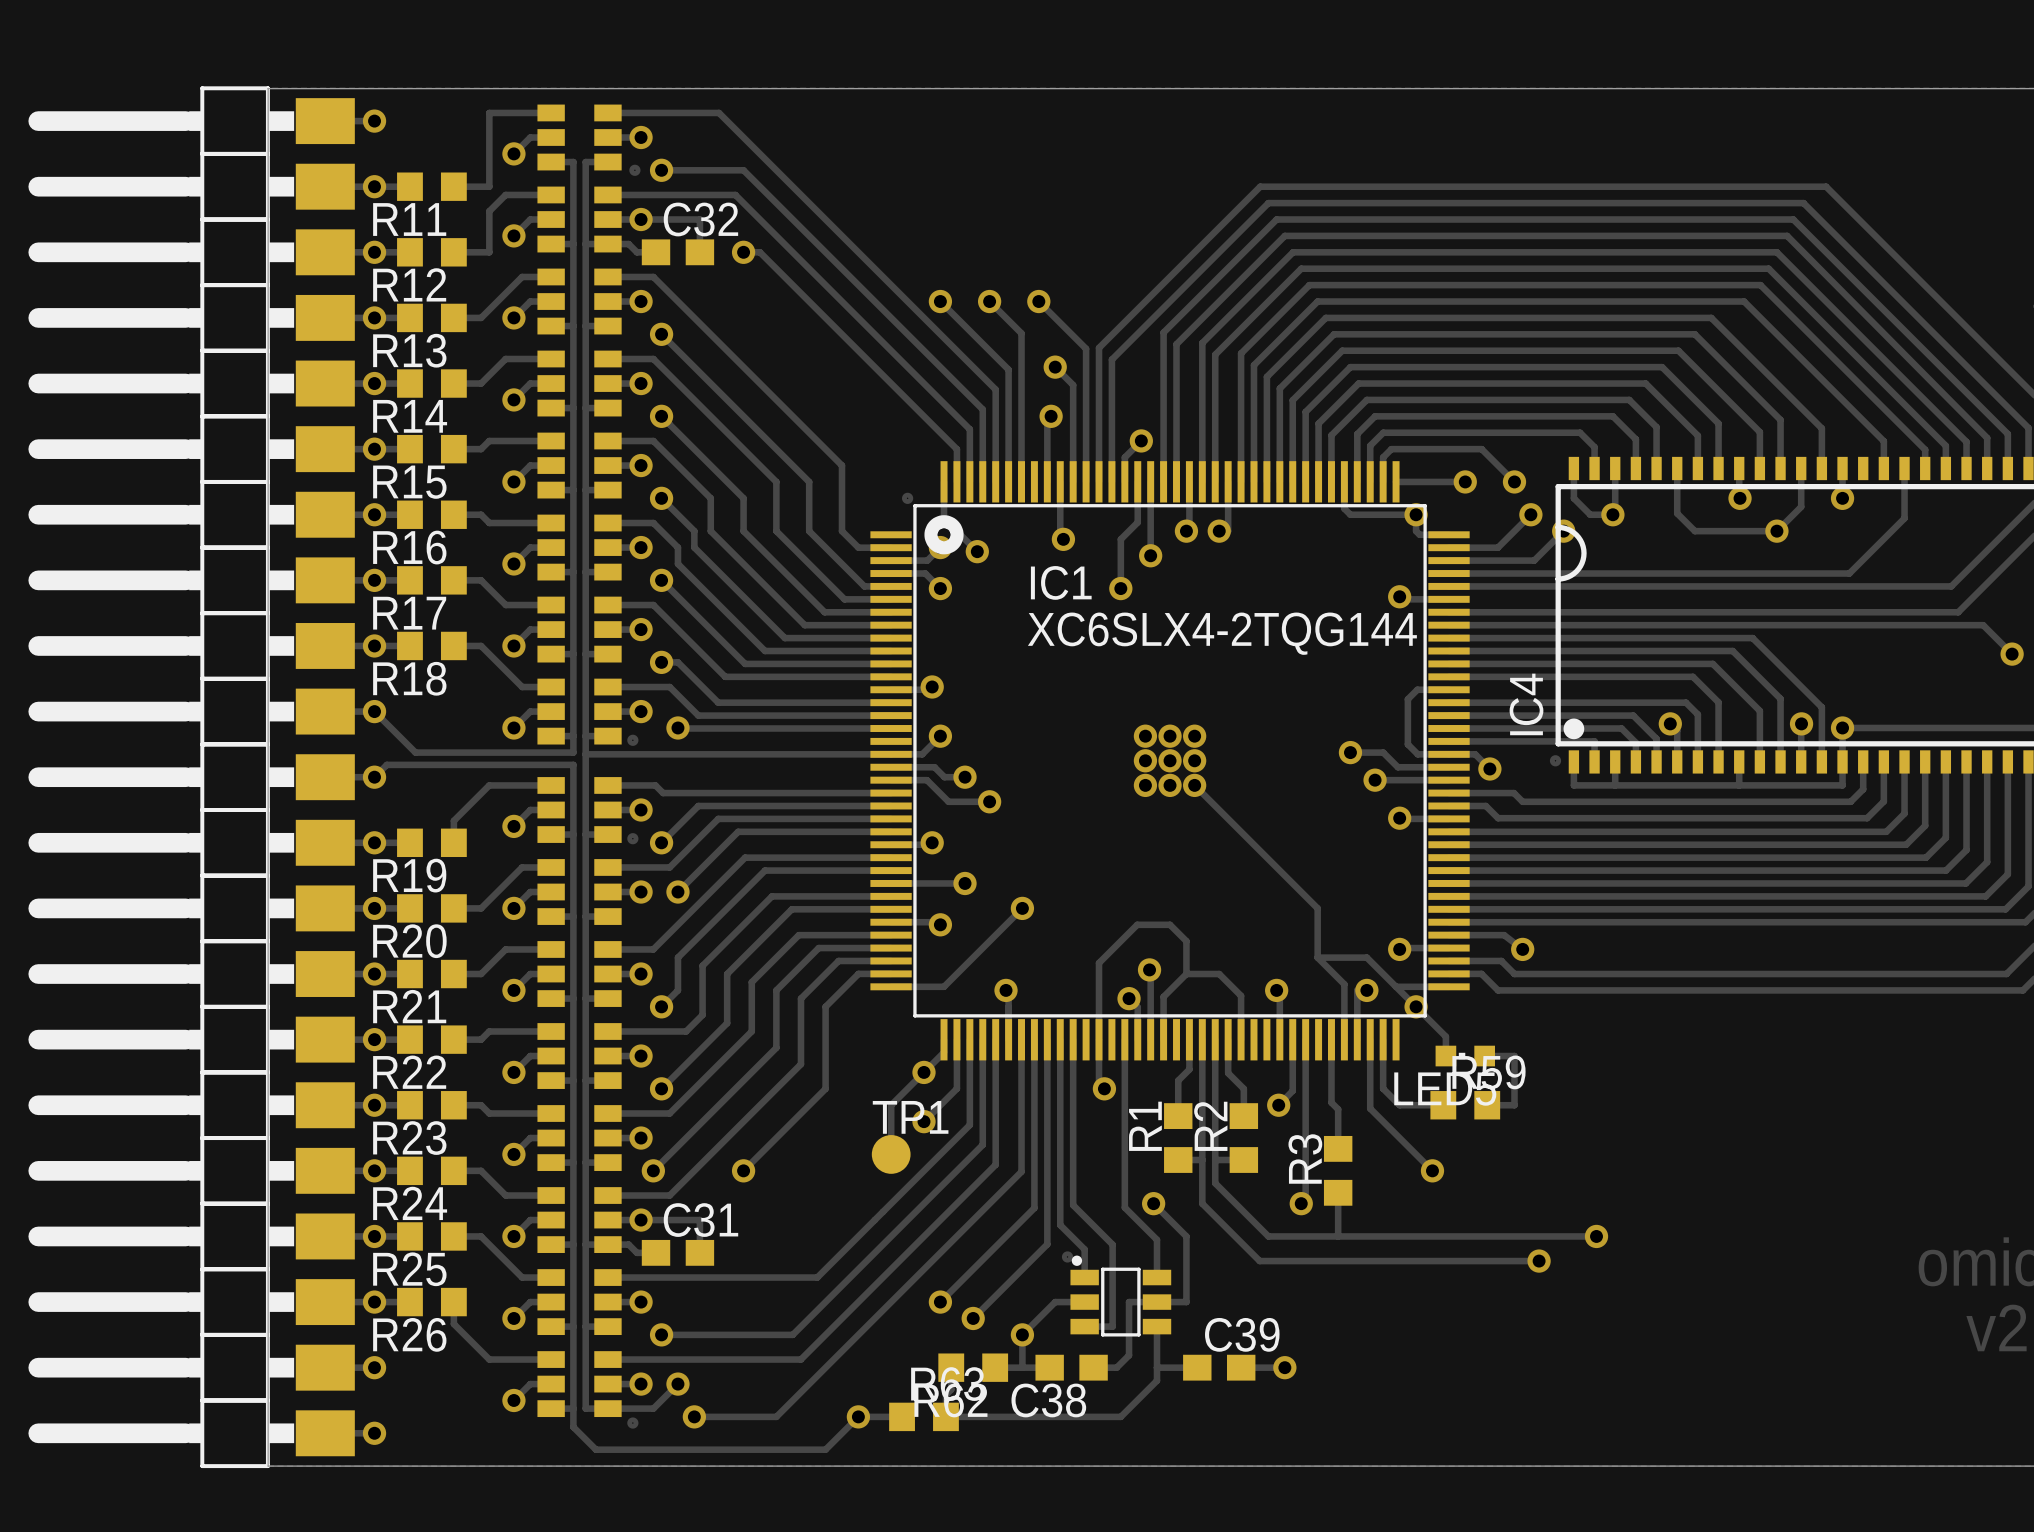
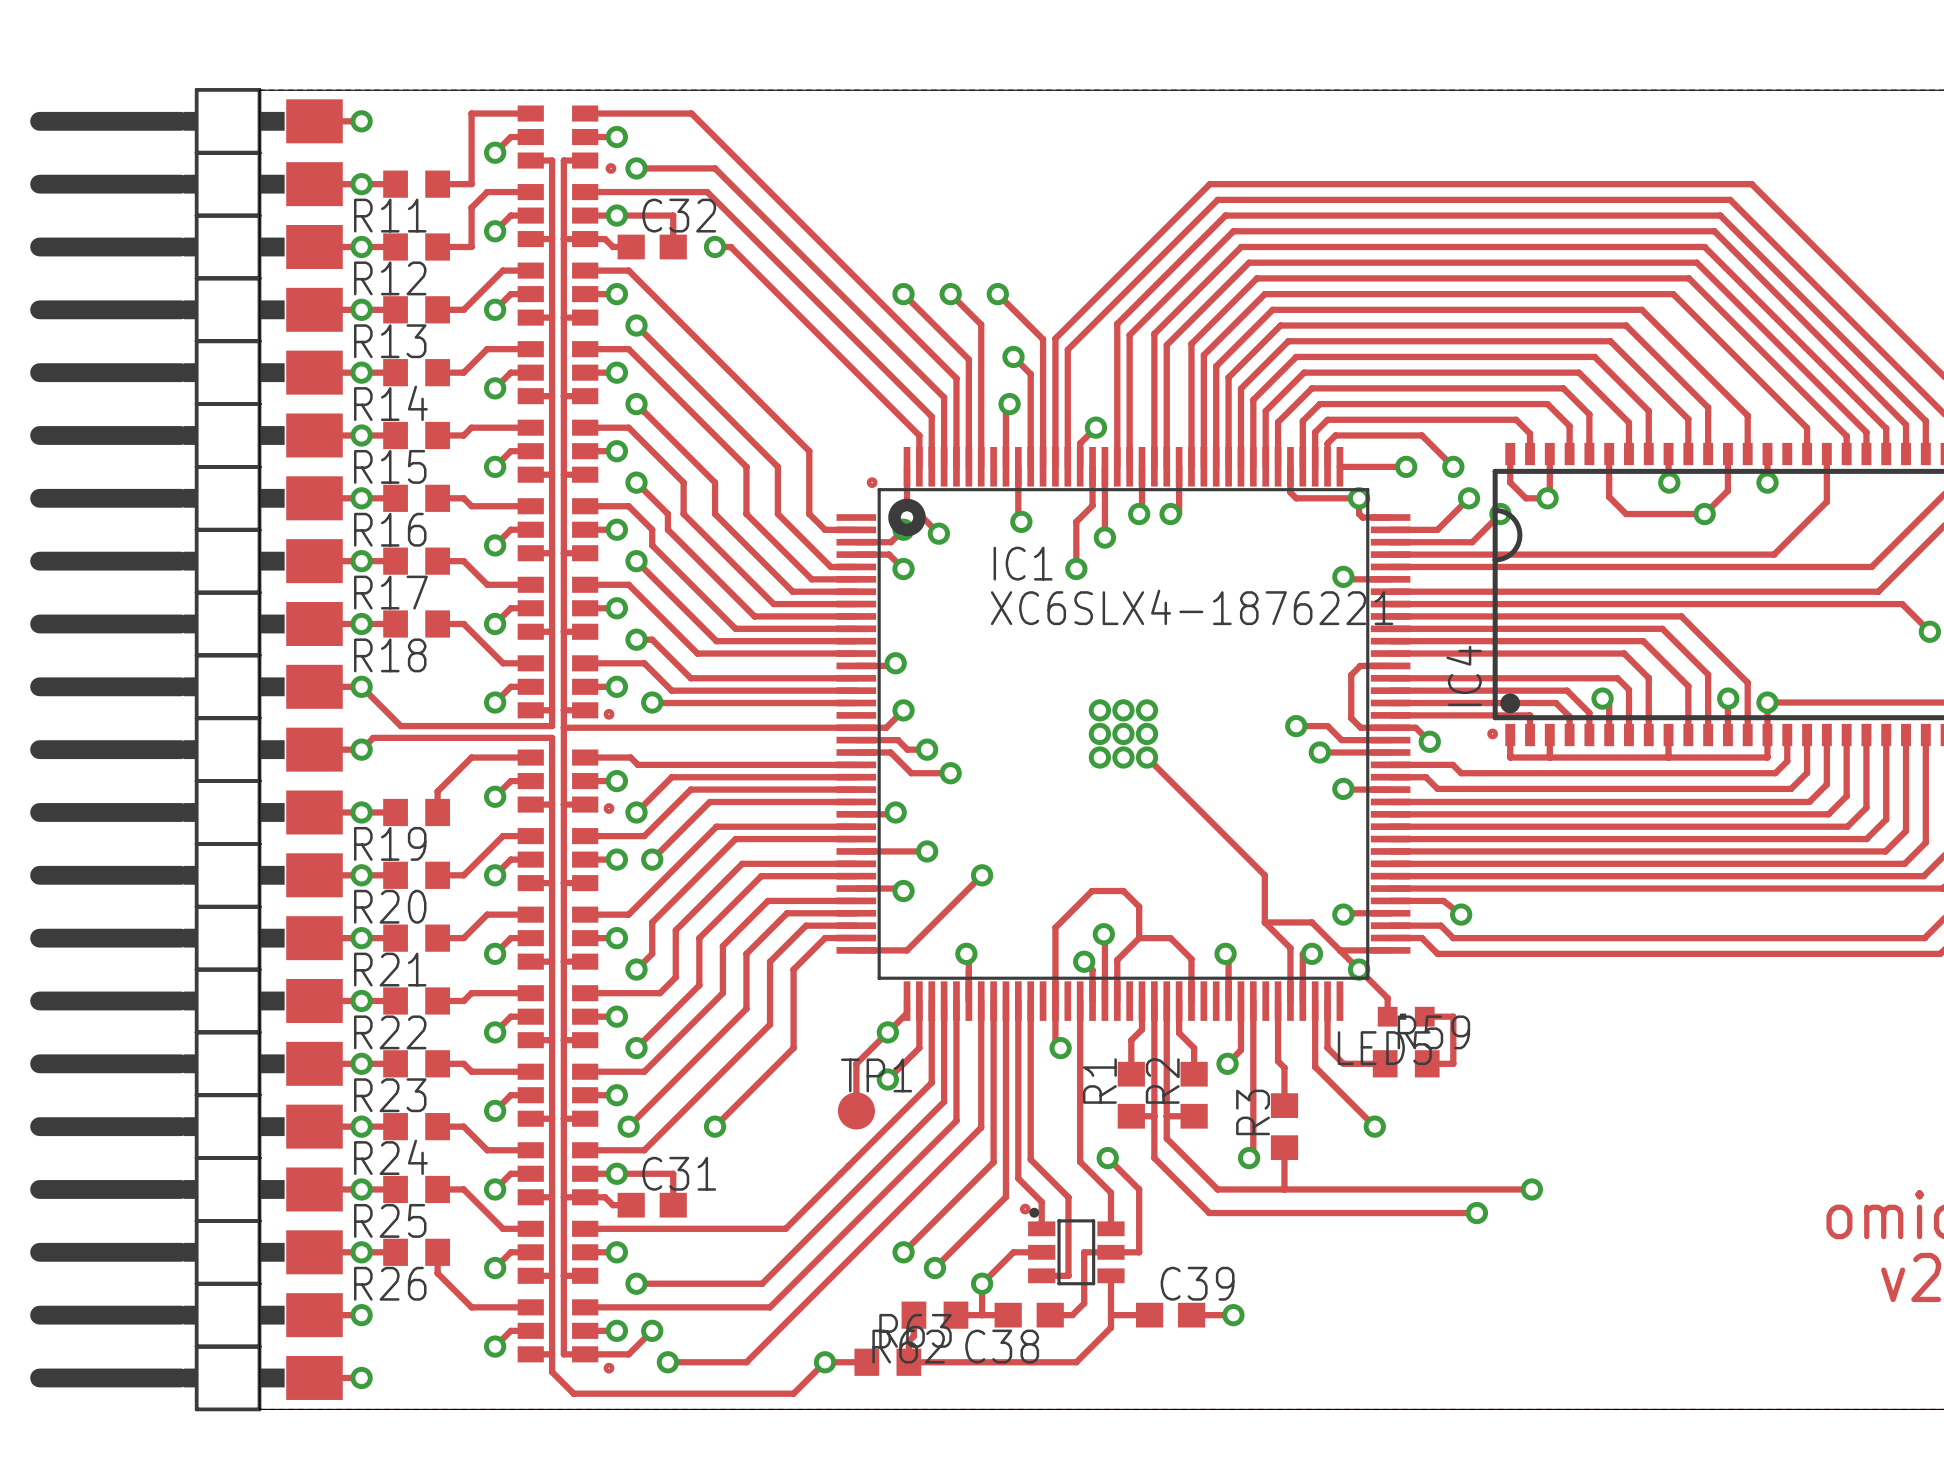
IC1 value: XC6SLX4-2TQG144 (1222, 633) -> XC6SLX4-1876221 (1192, 607)

